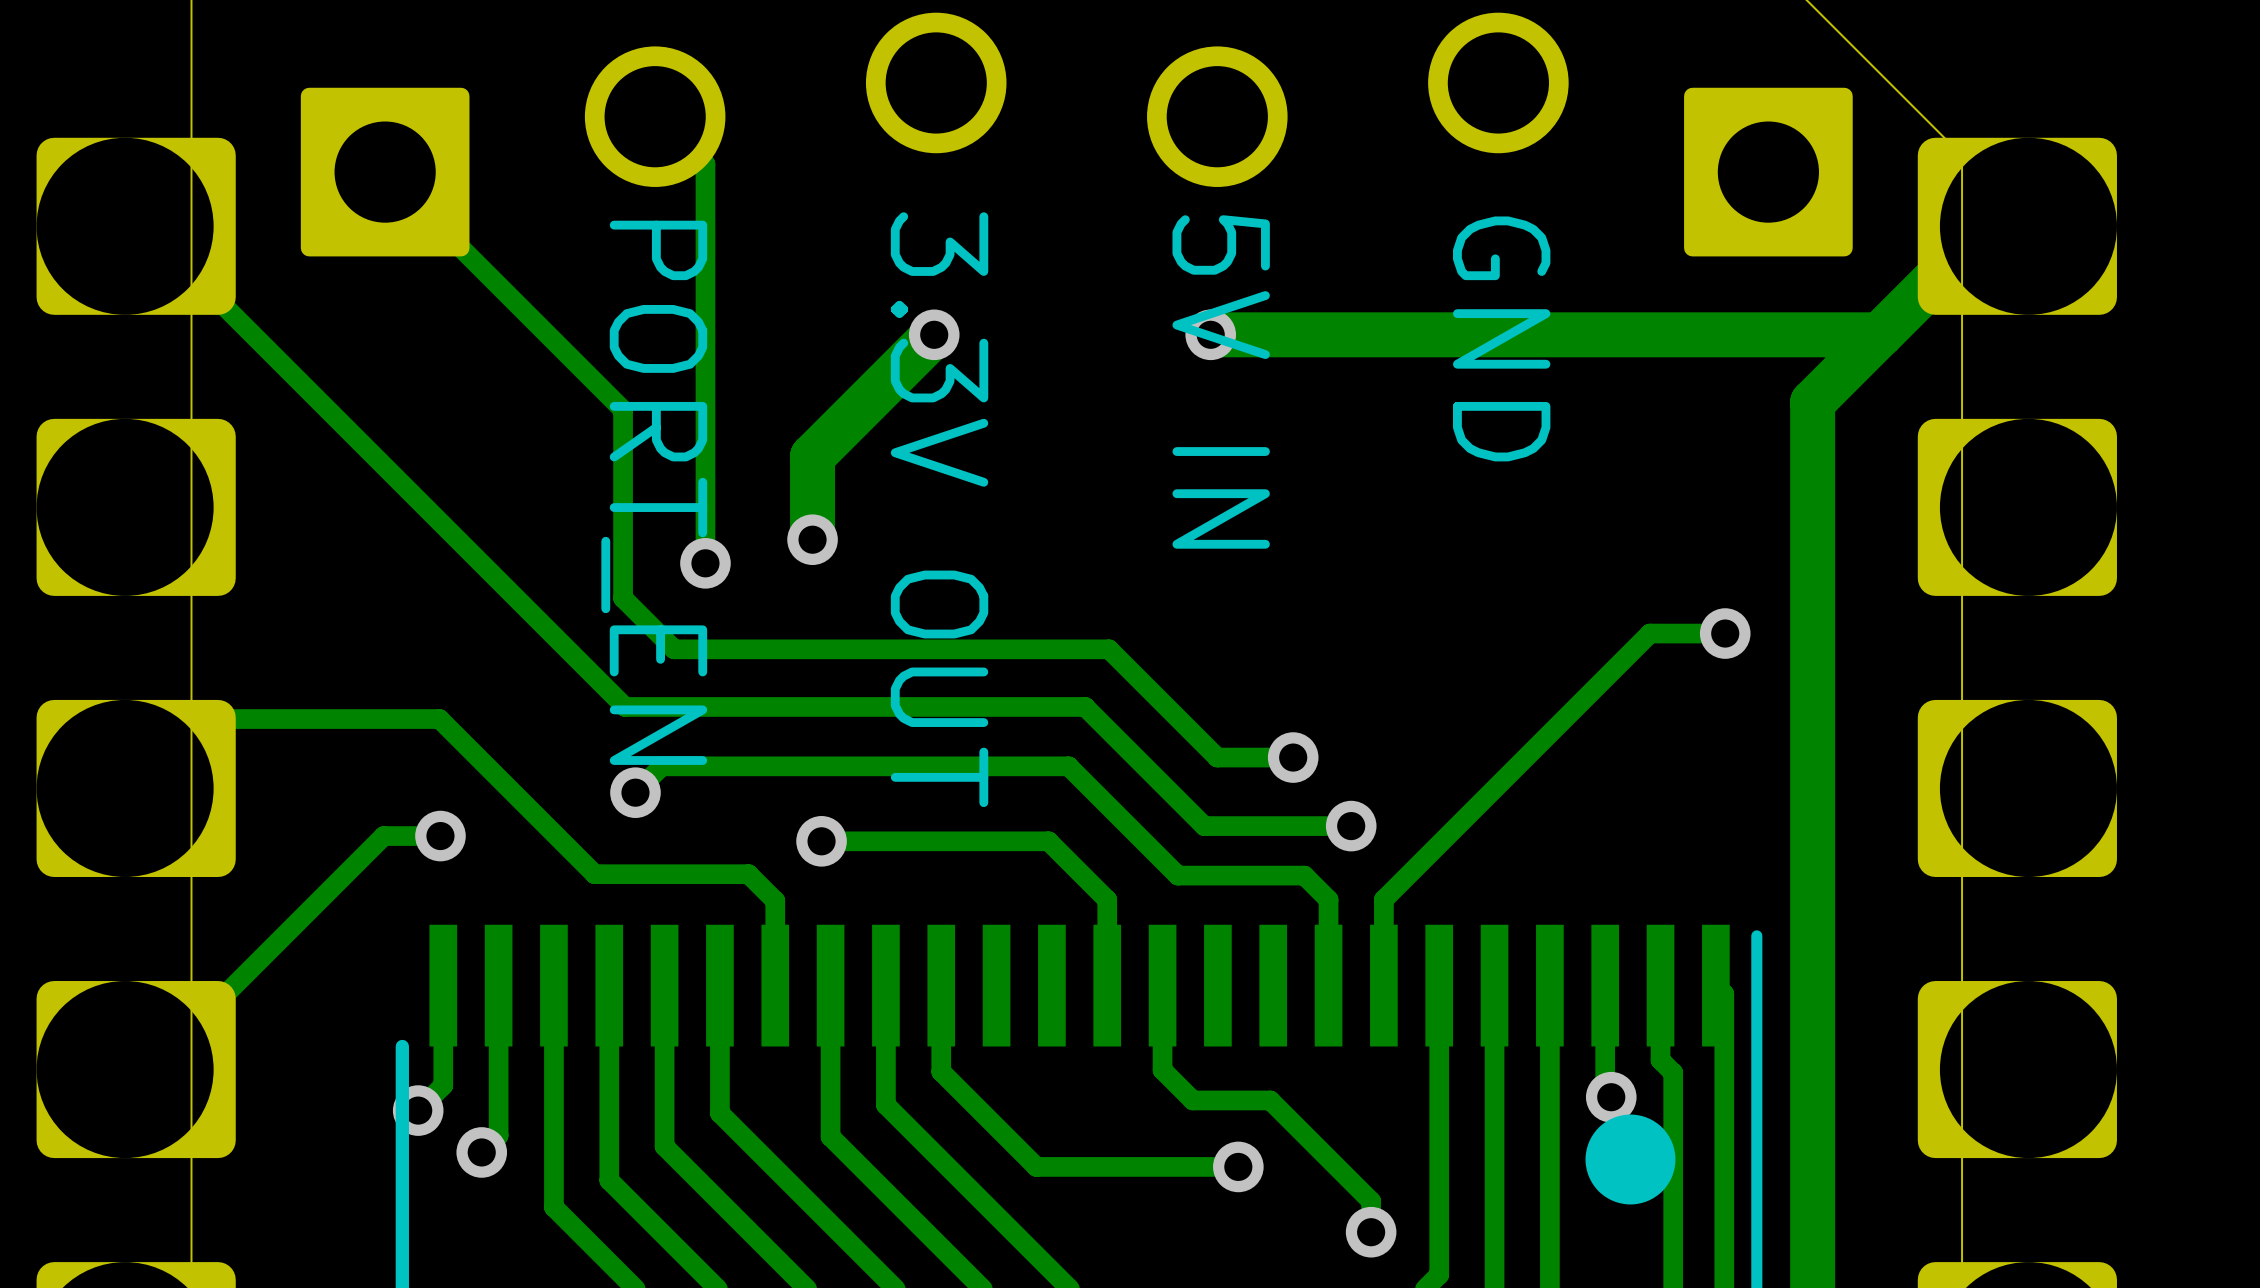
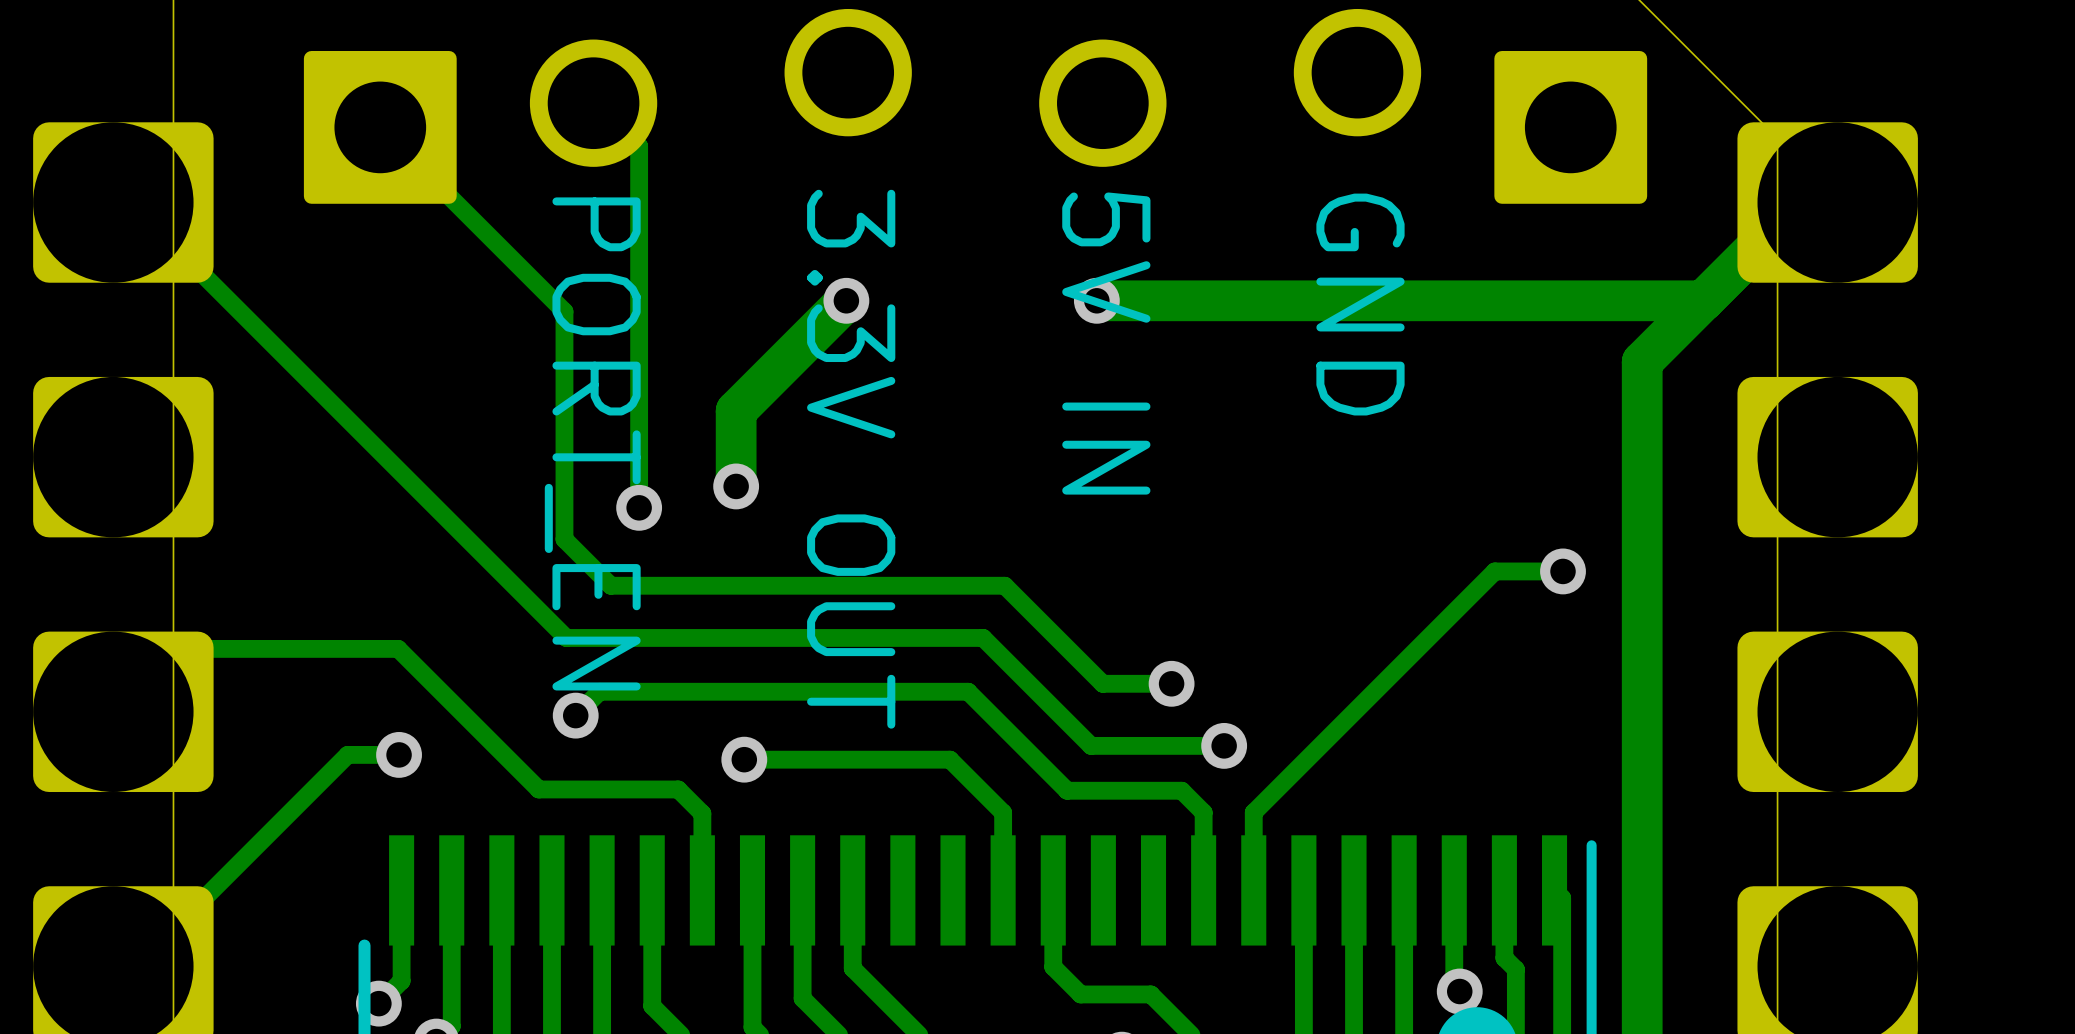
track: (385, 172) (623, 410) -> (380, 127) (564, 311) (564, 368)
part position: (385, 172) -> (380, 127)
part position: (1768, 172) -> (1570, 127)

